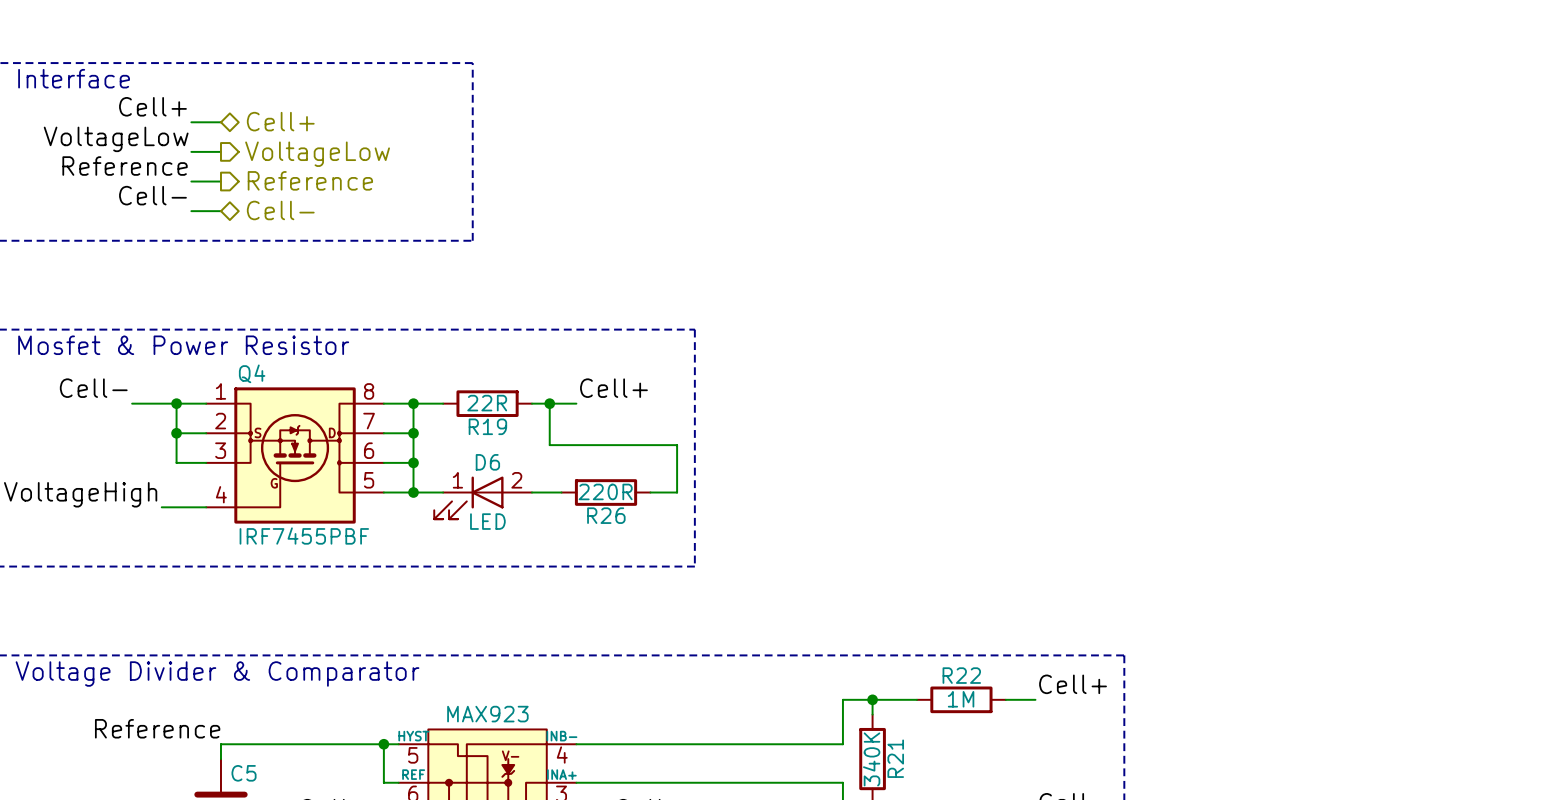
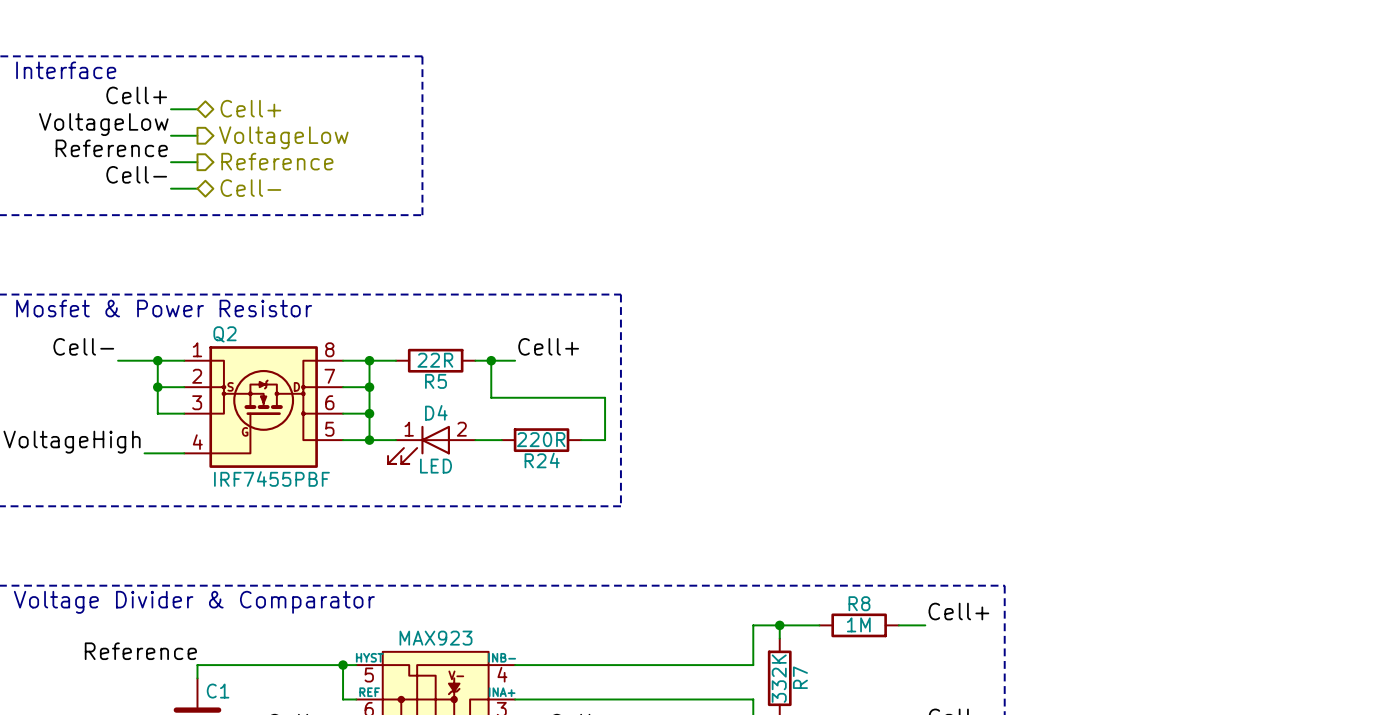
Q4 name: Q4 (252, 373) -> Q2 (224, 334)
R19 name: R19 (487, 426) -> R5 (436, 381)
D6 name: D6 (487, 462) -> D4 (436, 412)
R26 name: R26 (606, 515) -> R24 (542, 460)
R22 name: R22 (961, 675) -> R8 (859, 603)
R21 name: R21 (895, 758) -> R7 (800, 677)
R21 value: 340K (871, 759) -> 332K (779, 678)
C5 name: C5 (244, 773) -> C1 (218, 691)

